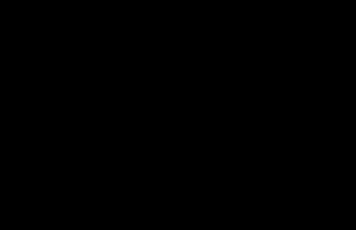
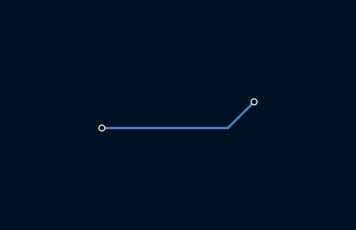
track: none -> (254, 101) (227, 128) (101, 128)
via: none -> (254, 101)
via: none -> (101, 128)

